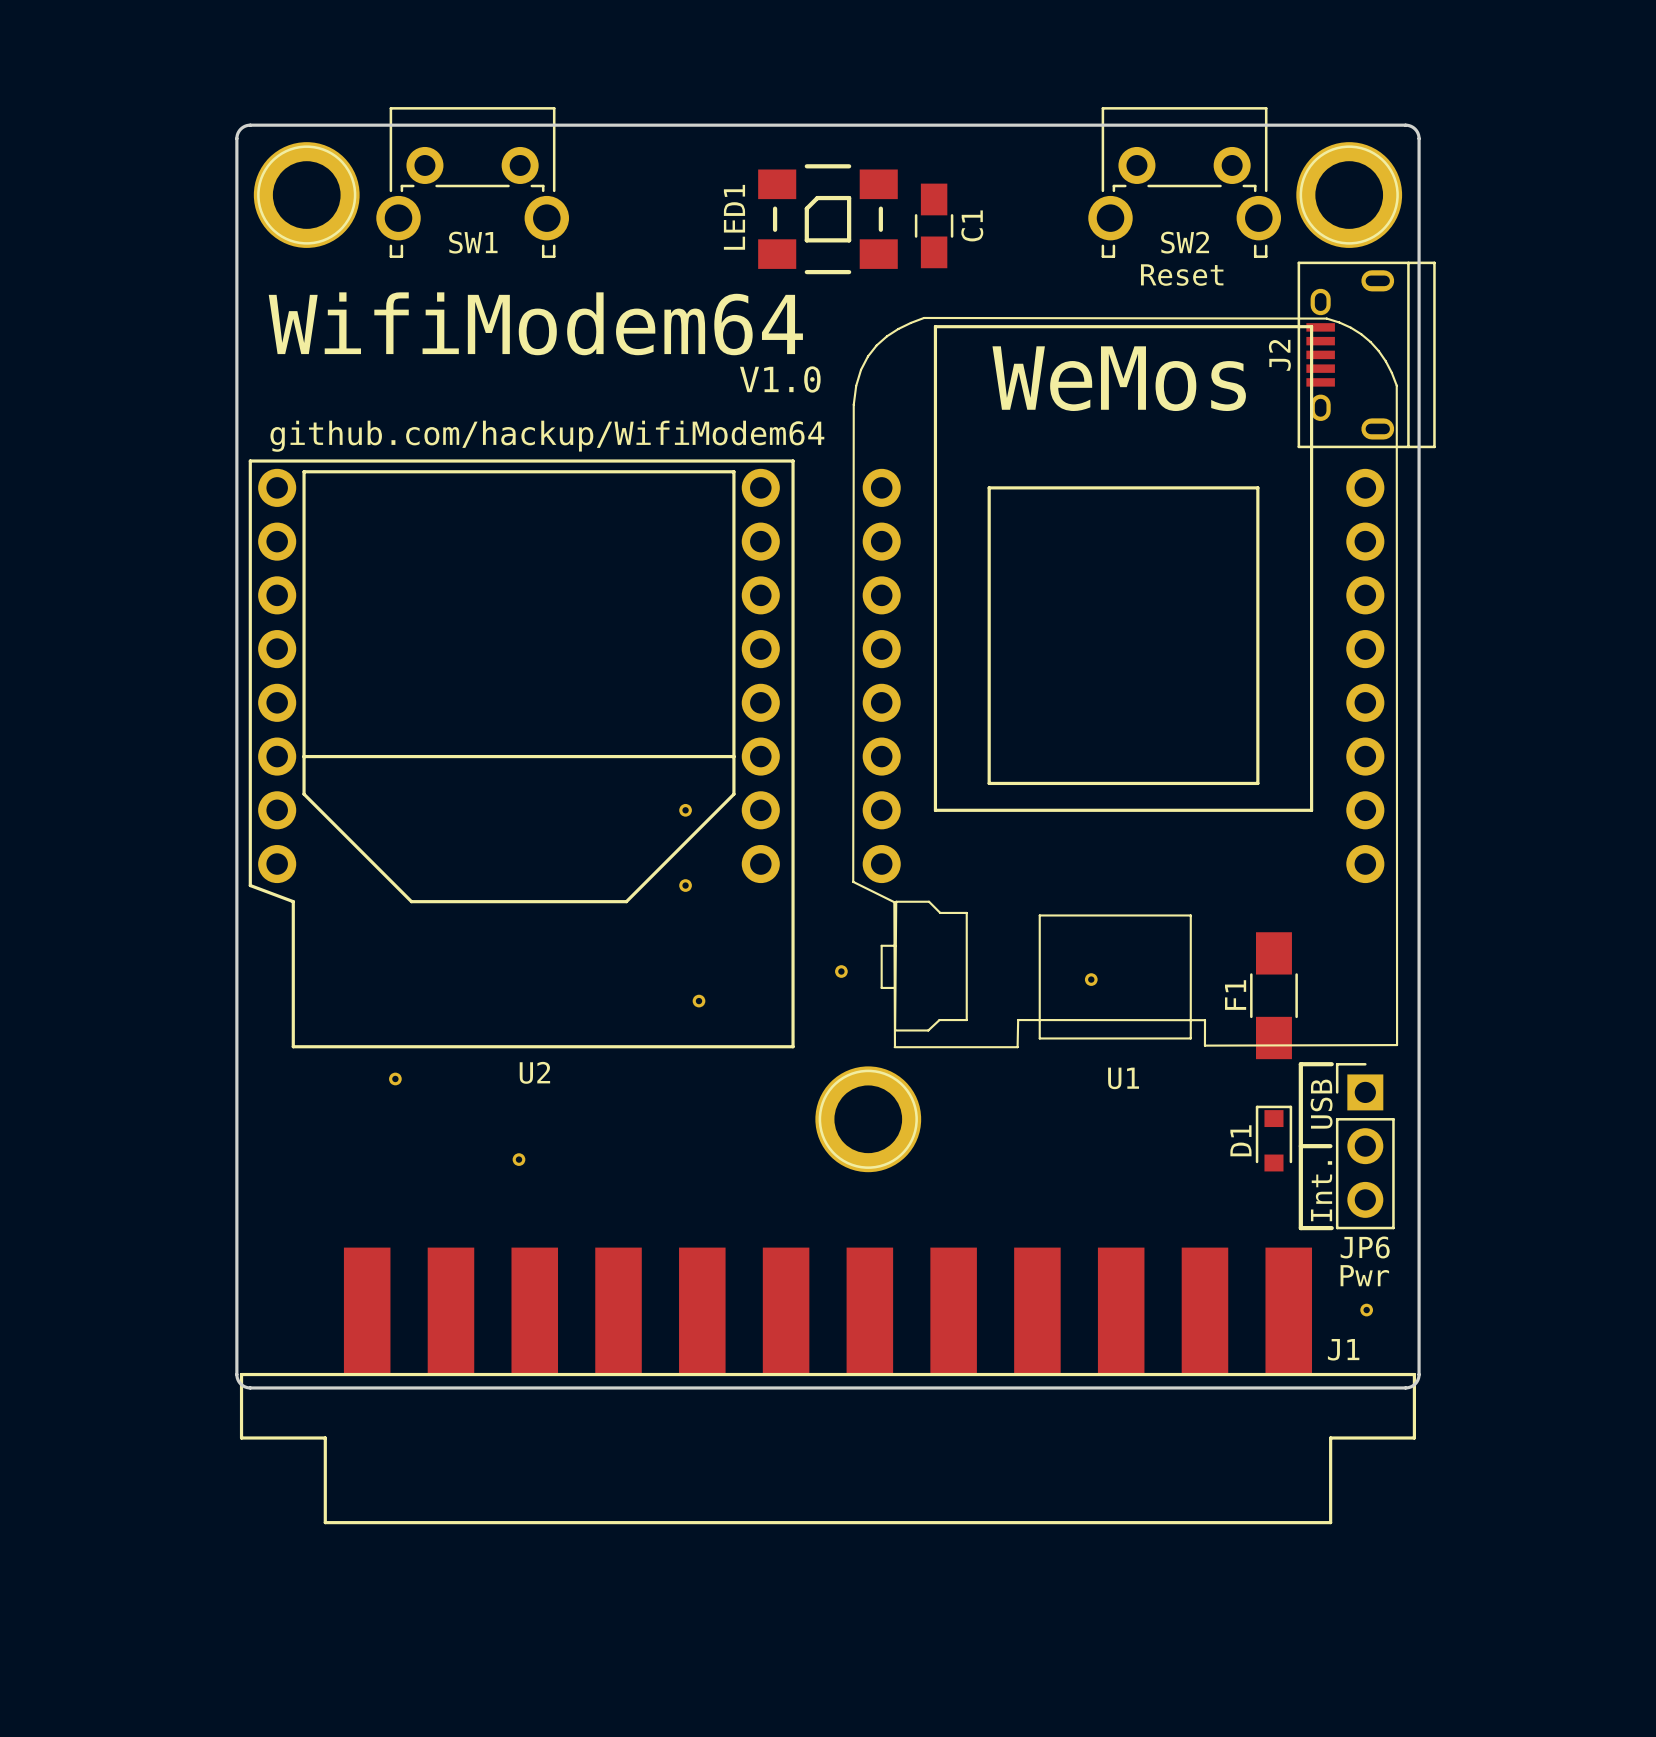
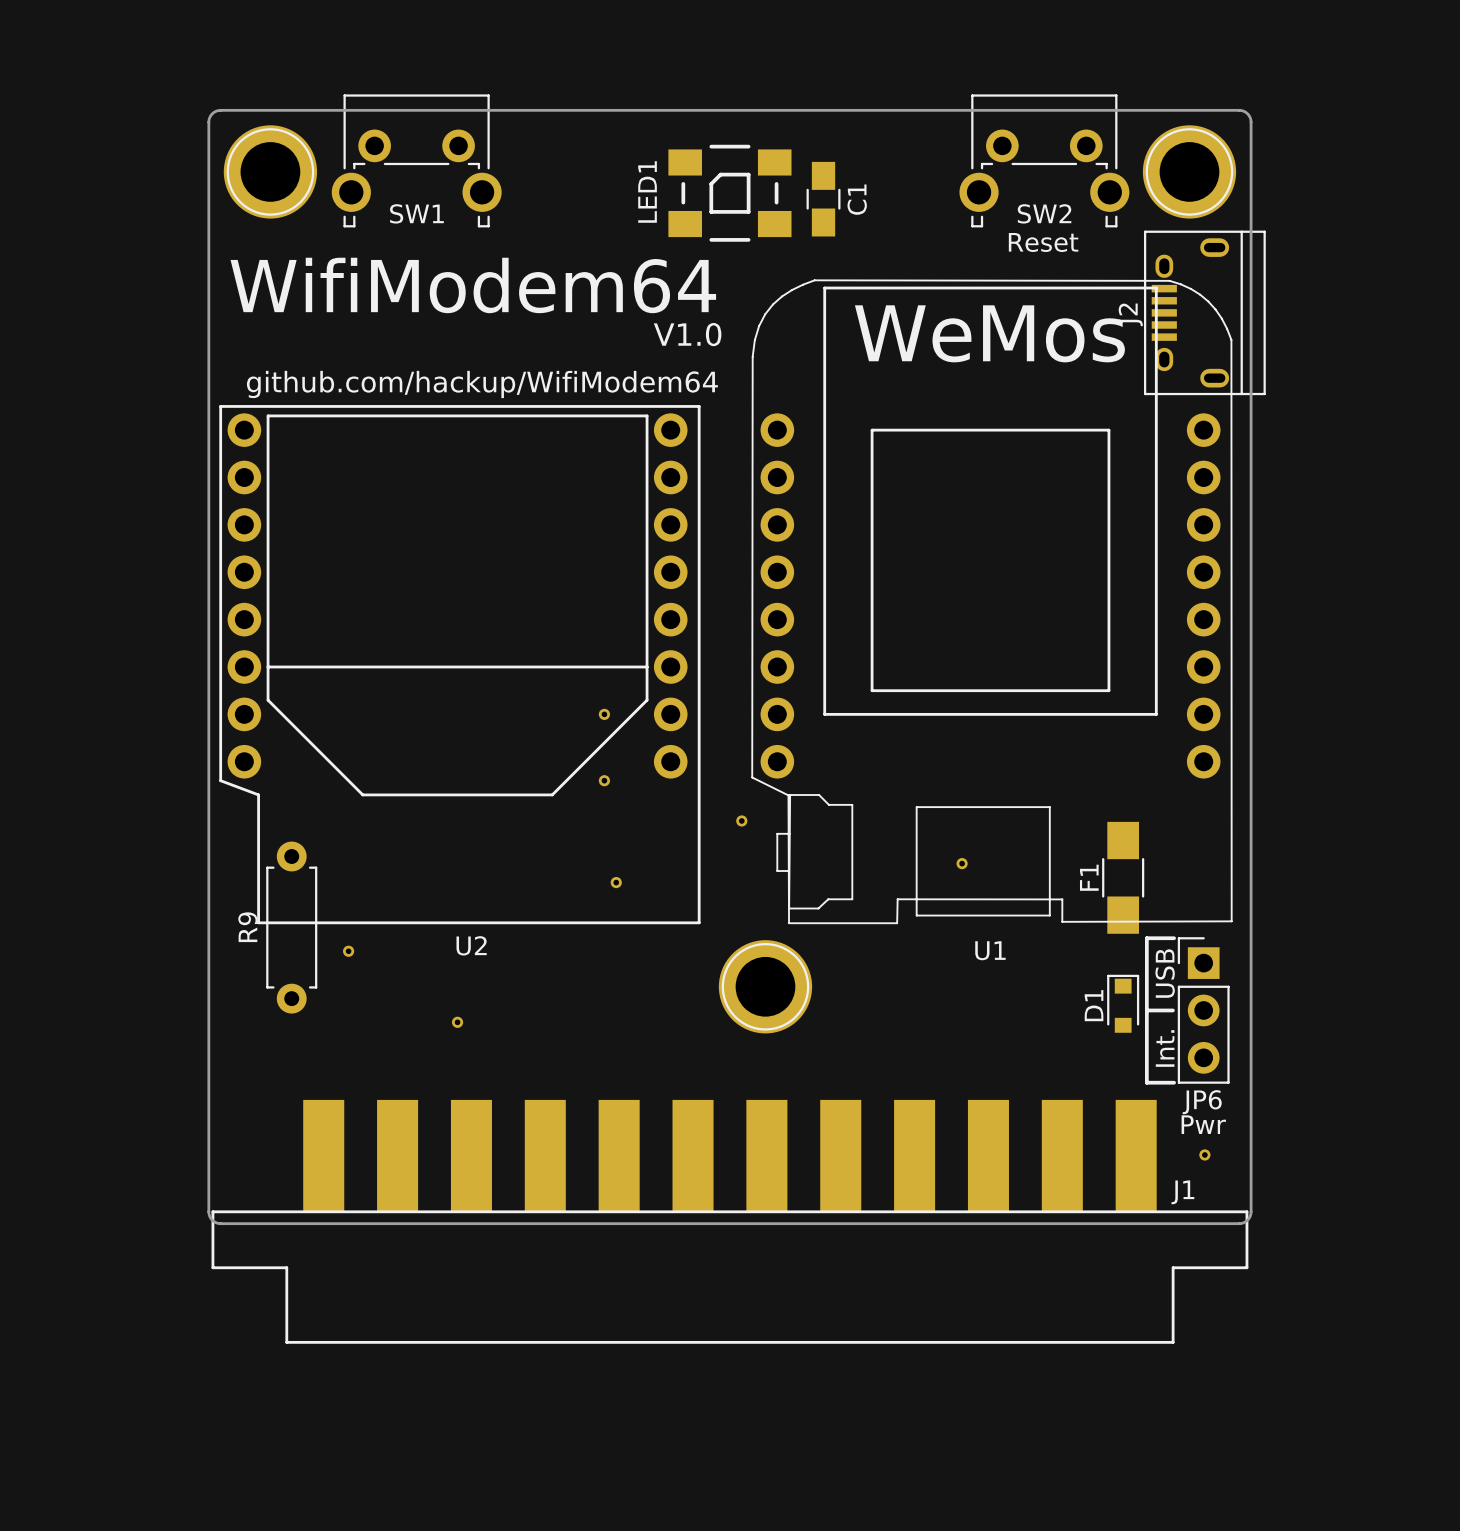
part position: (841, 971) -> (741, 820)
R9: none -> (291, 927)

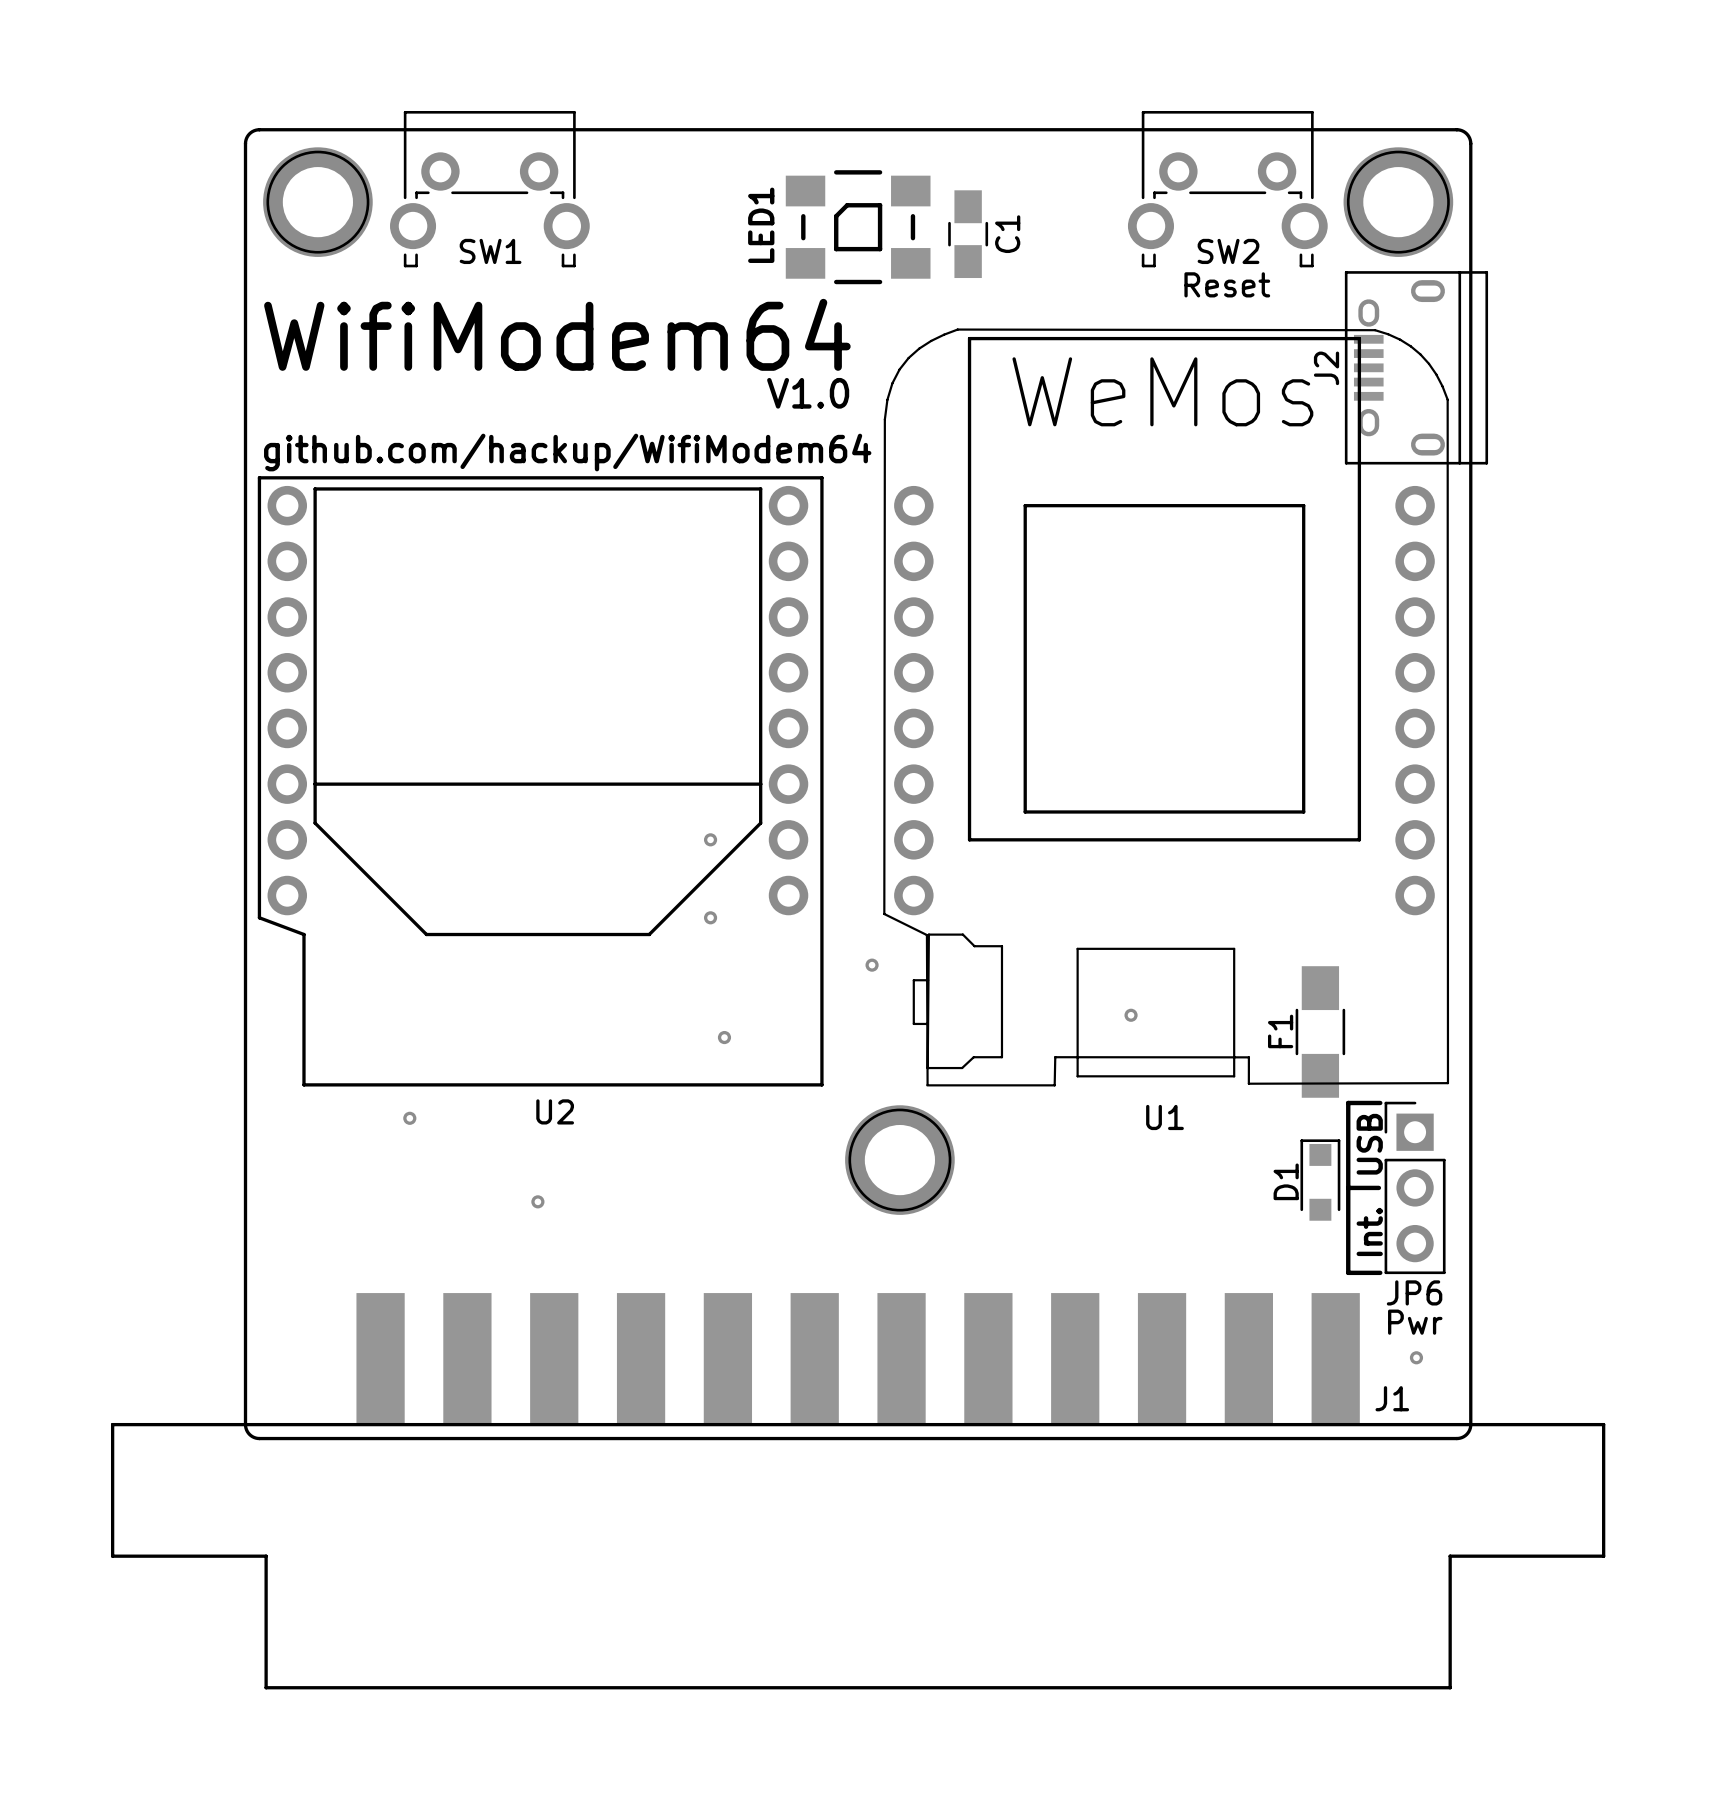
R9: (291, 927) -> none
D1 footprint: [1107, 974, 1140, 1033] -> [1300, 1139, 1341, 1221]
J1 footprint: [211, 1099, 1249, 1344] -> [110, 1293, 1606, 1690]

